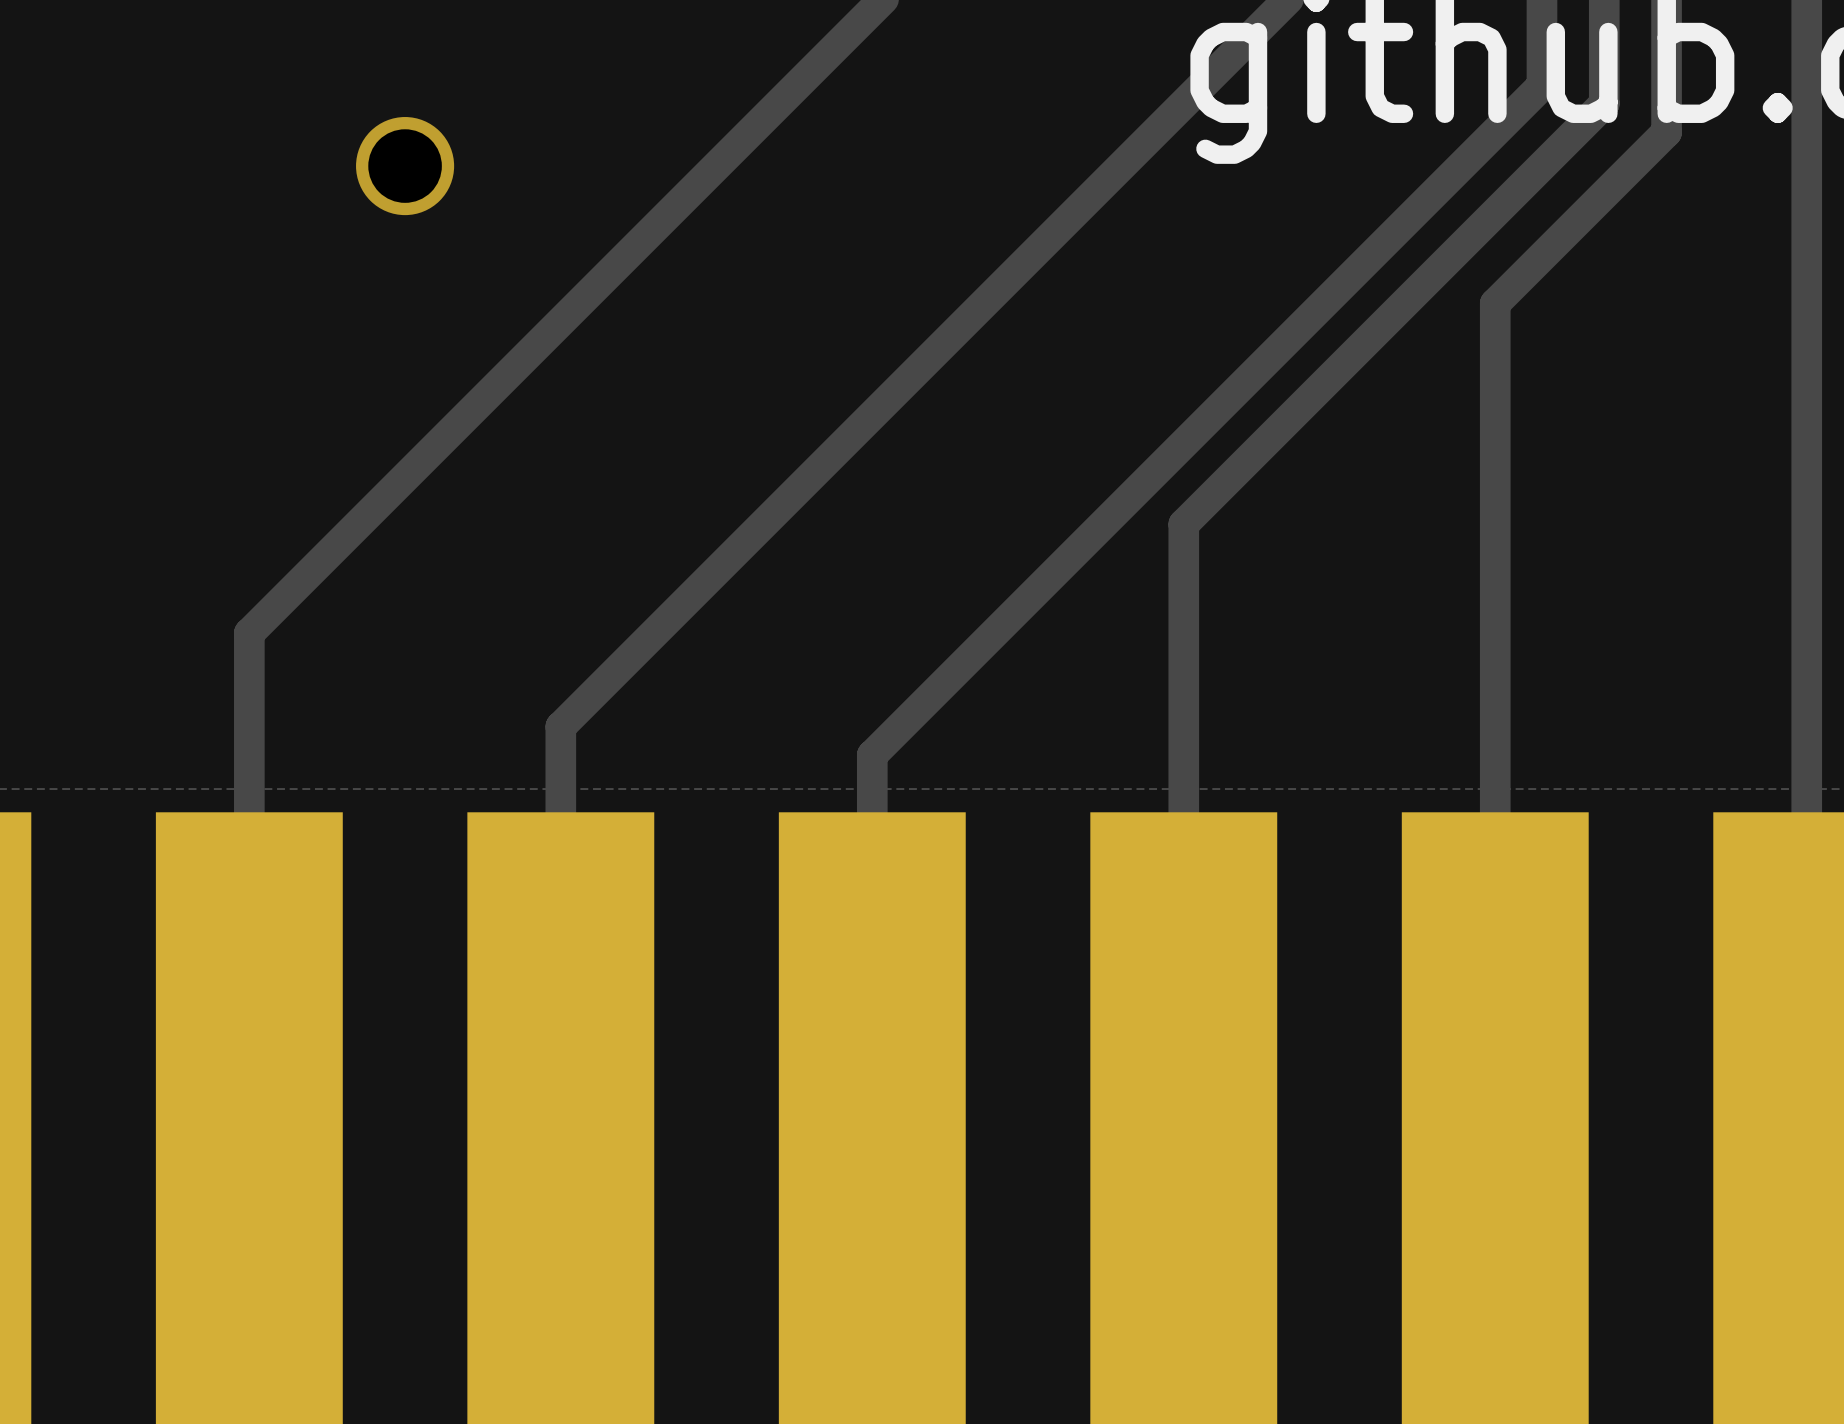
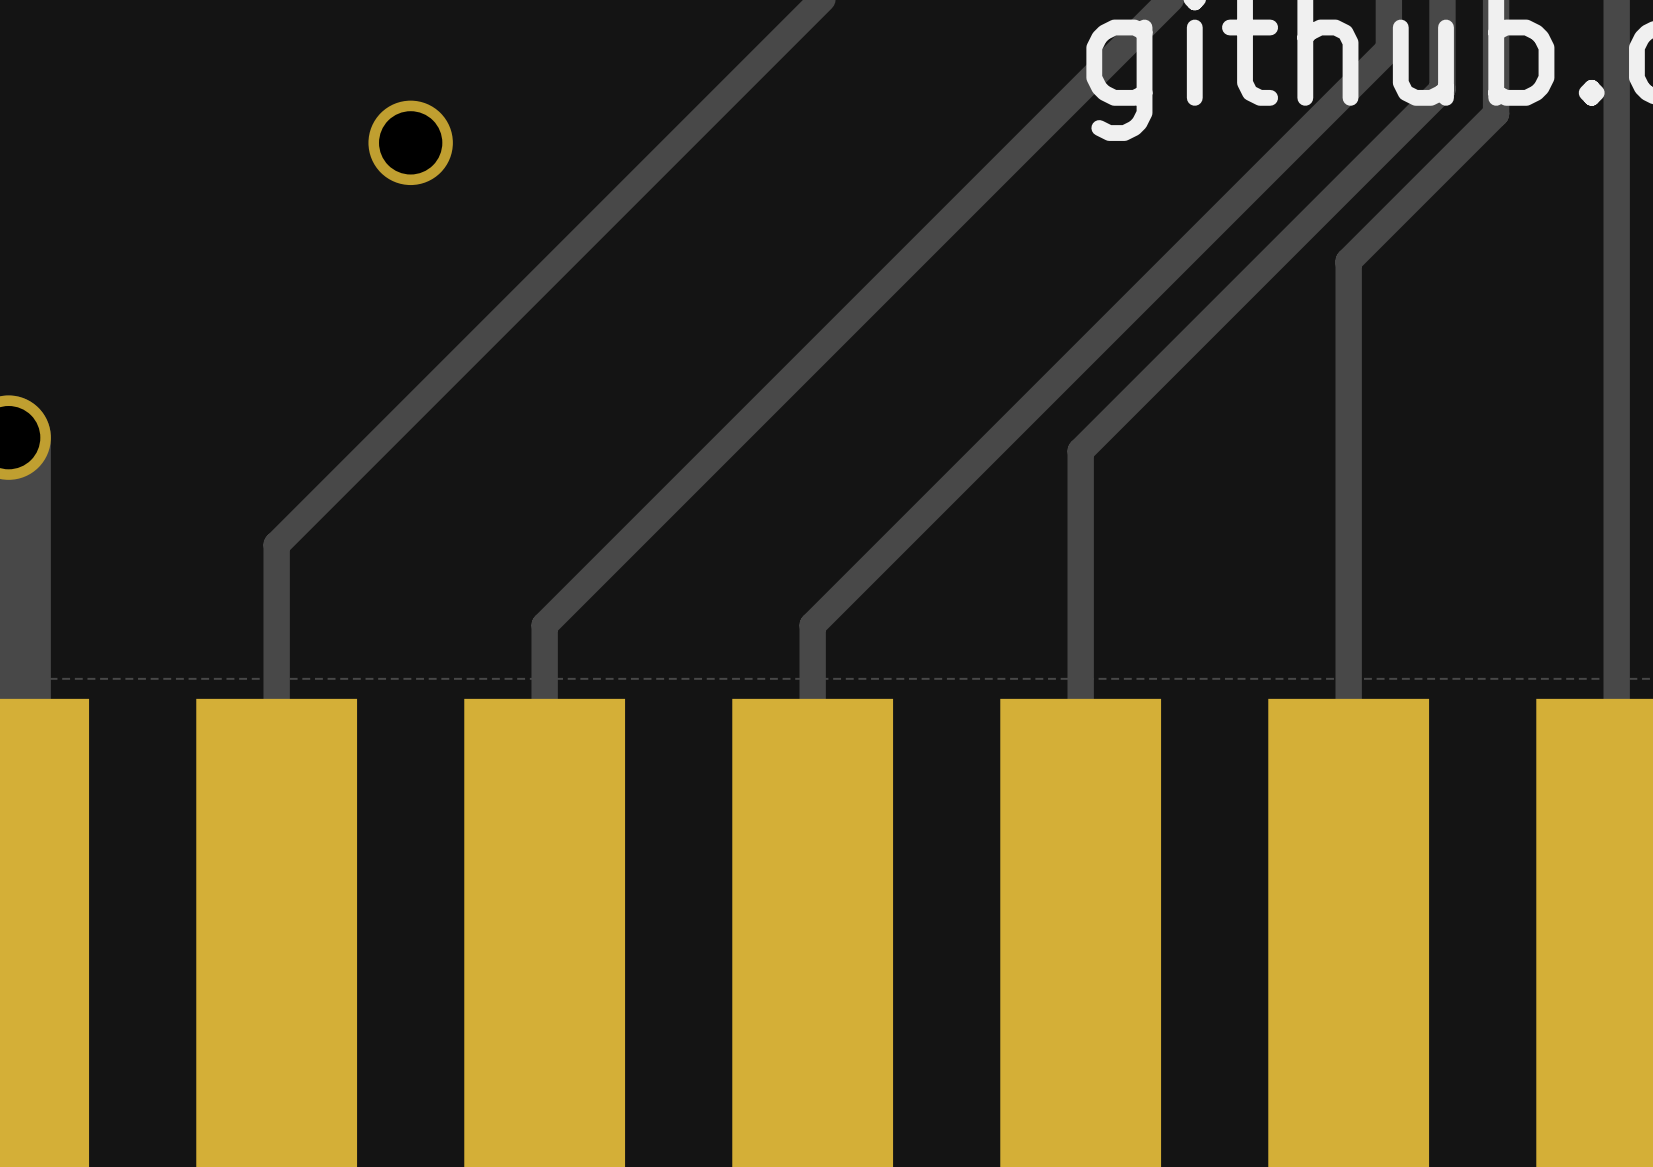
track: (1541, 57) (1541, 85) (872, 755) -> (1388, 49) (812, 625) (812, 649)

